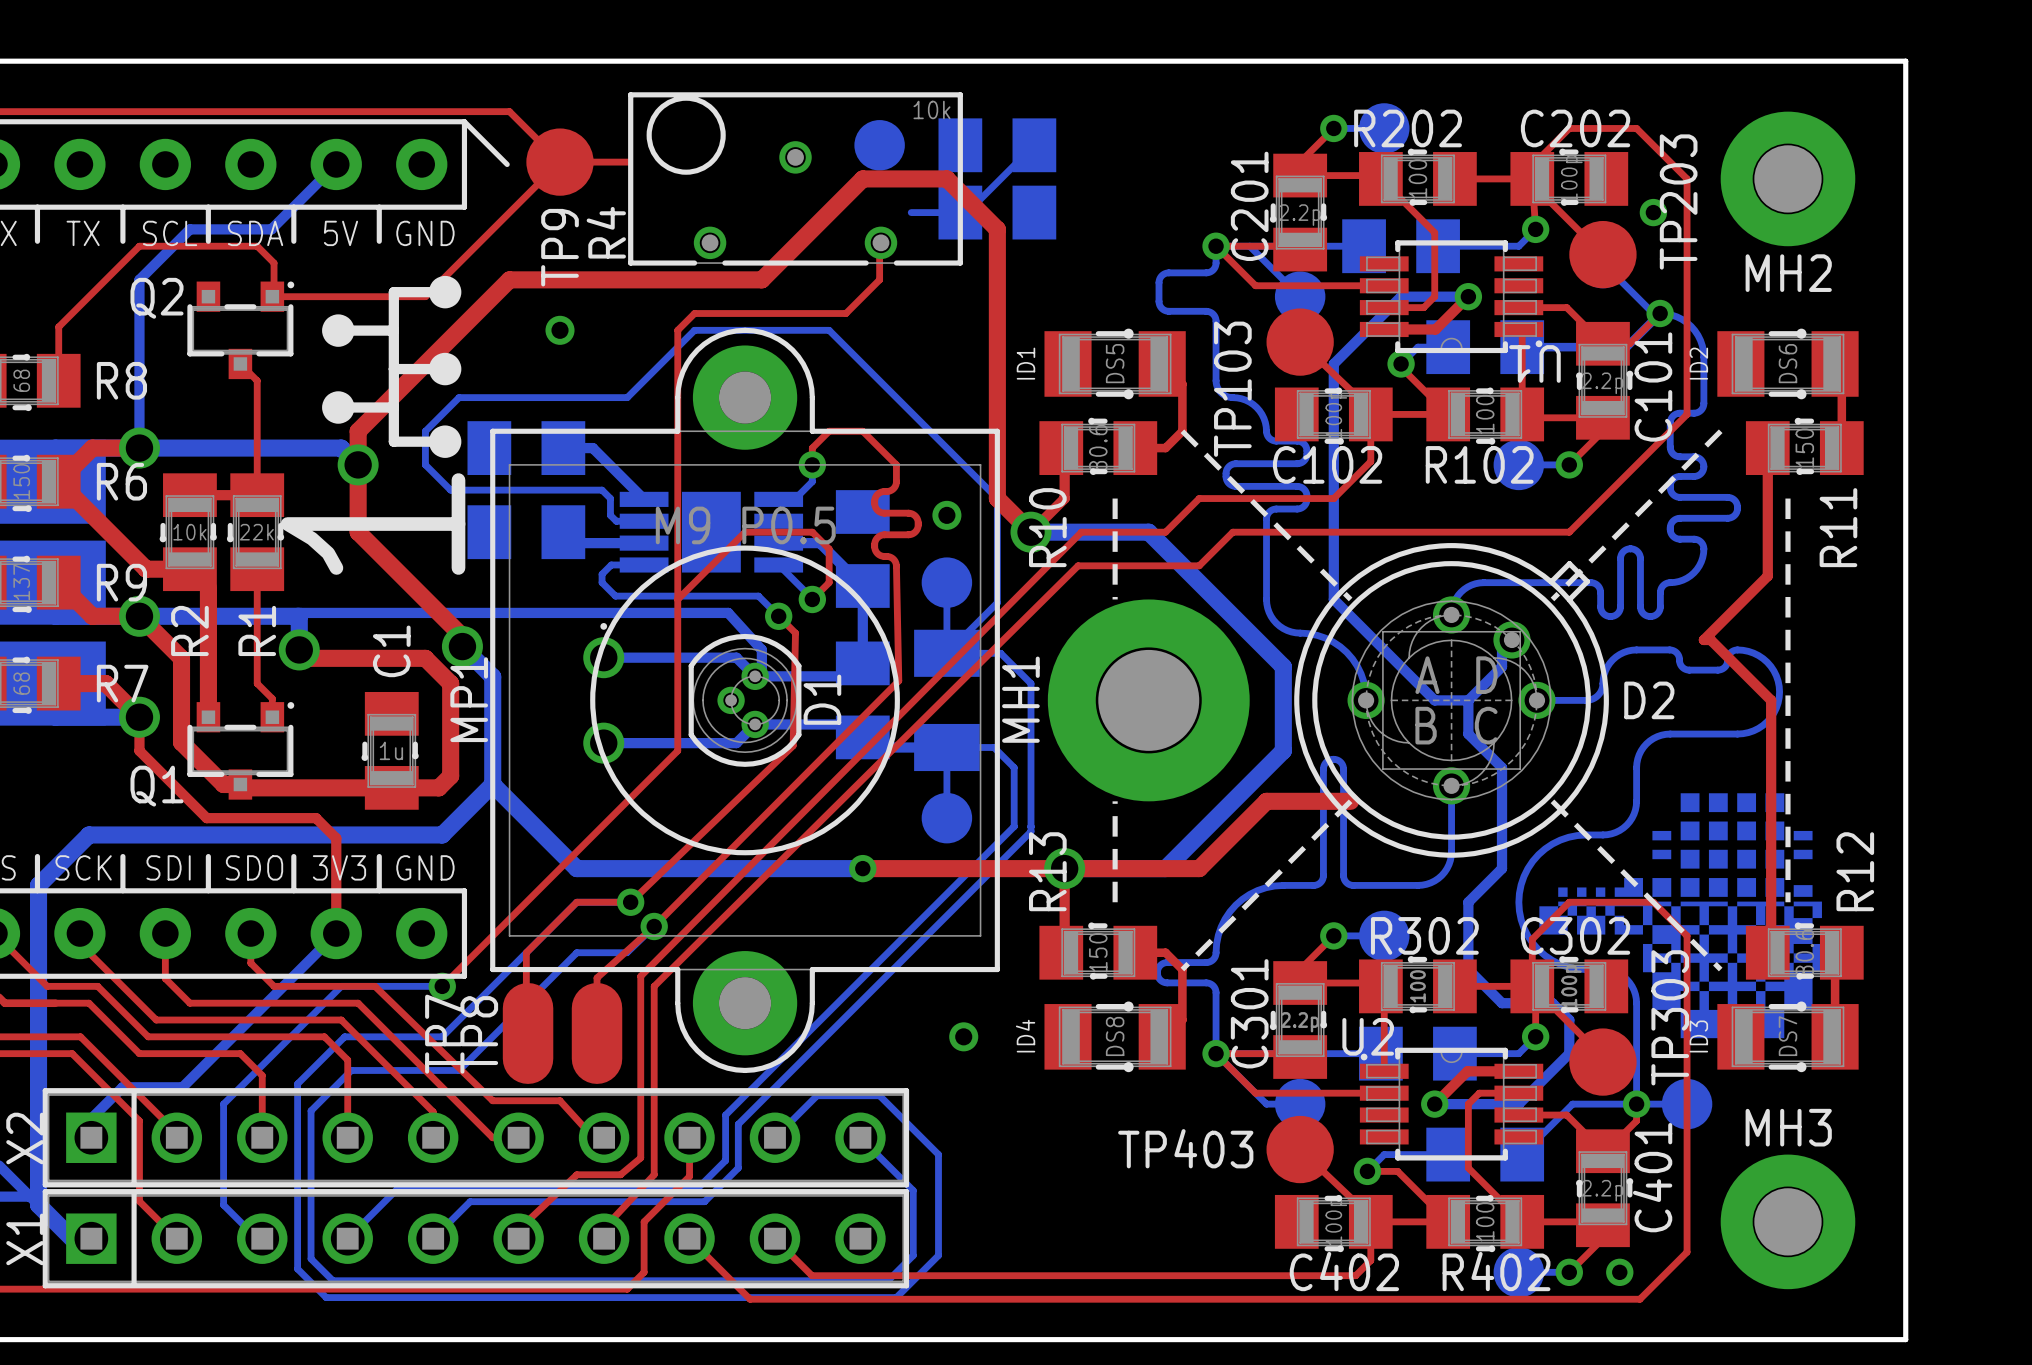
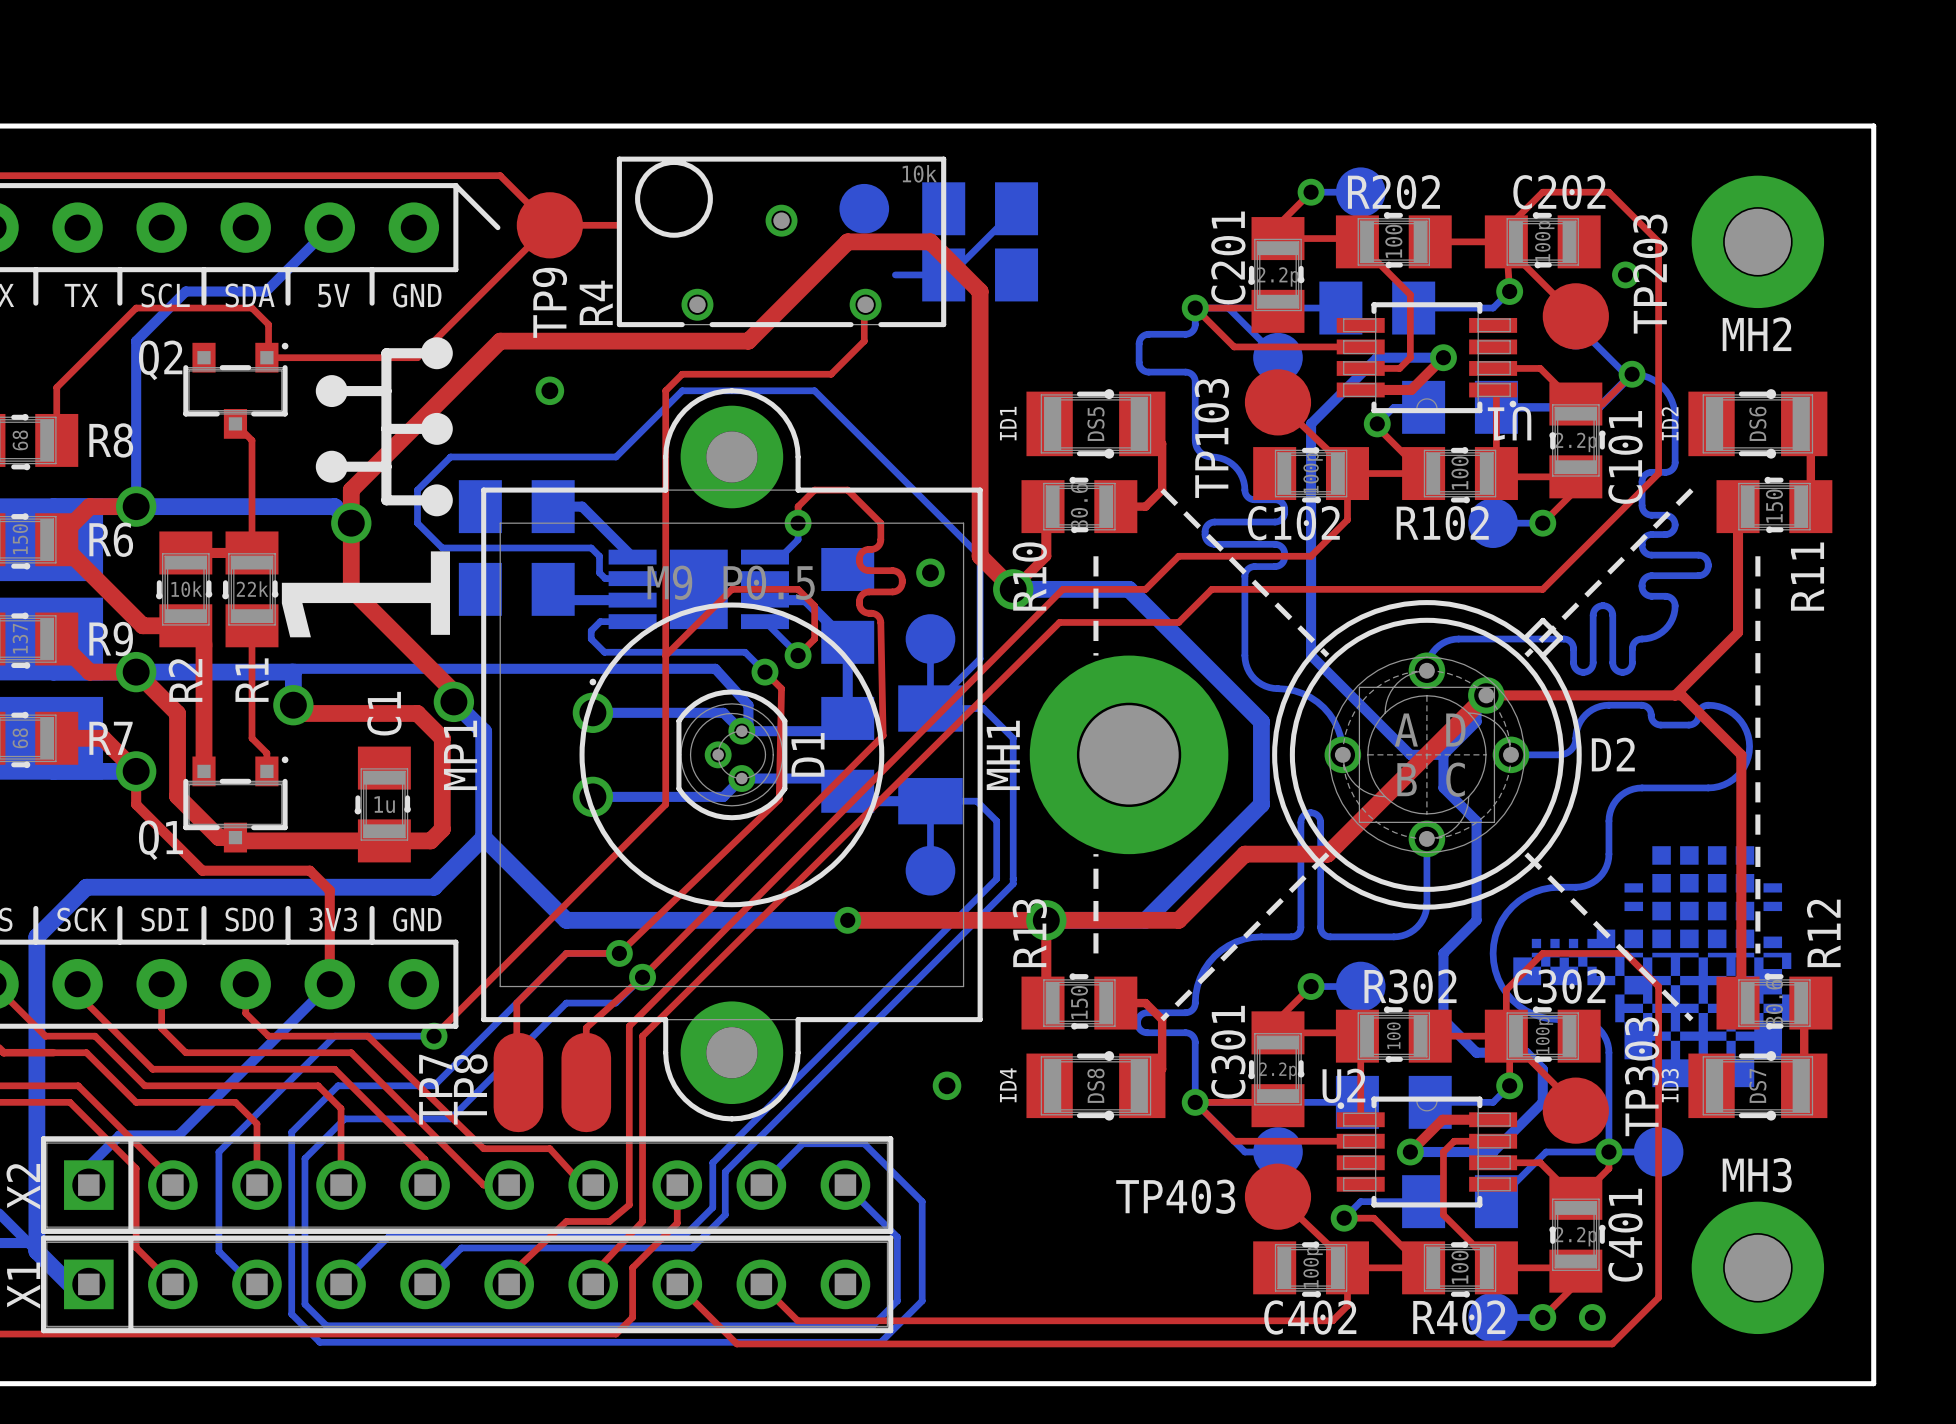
top track: none -> (1675, 695) (1486, 695) (1327, 854)

